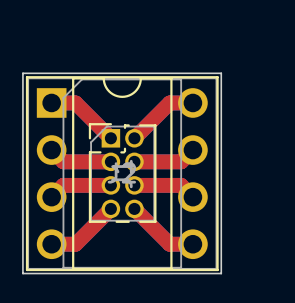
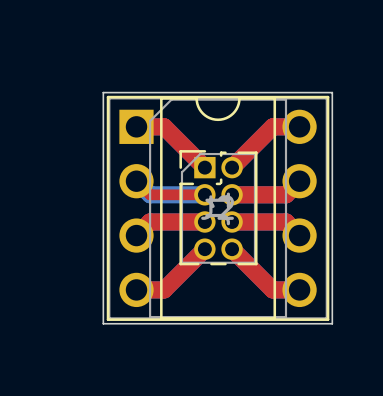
top track width: thick (51, 150) (63, 161) (110, 161) -> thin (136, 181) (150, 194) (204, 194)

